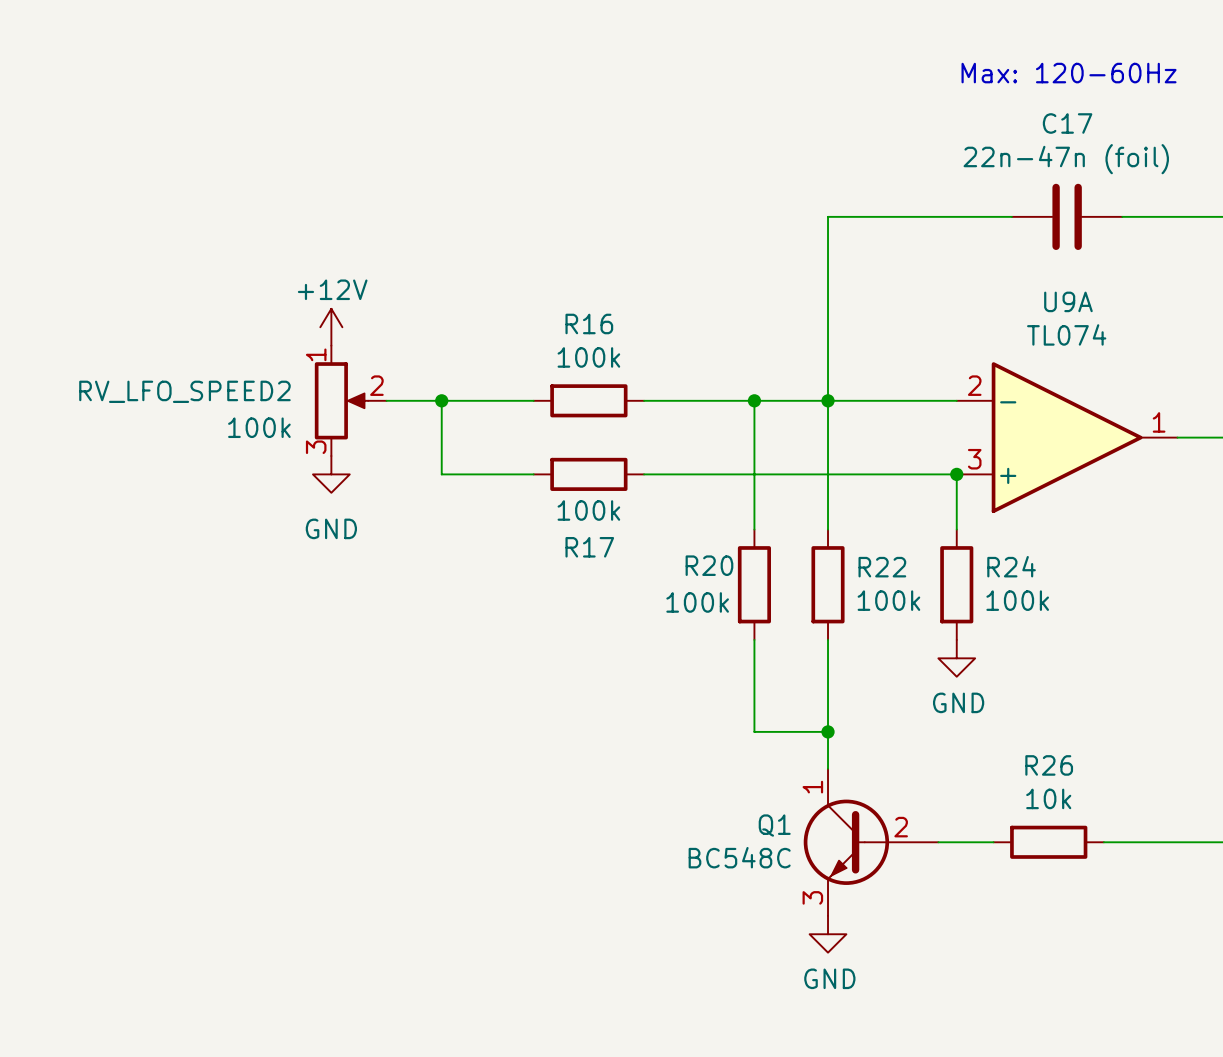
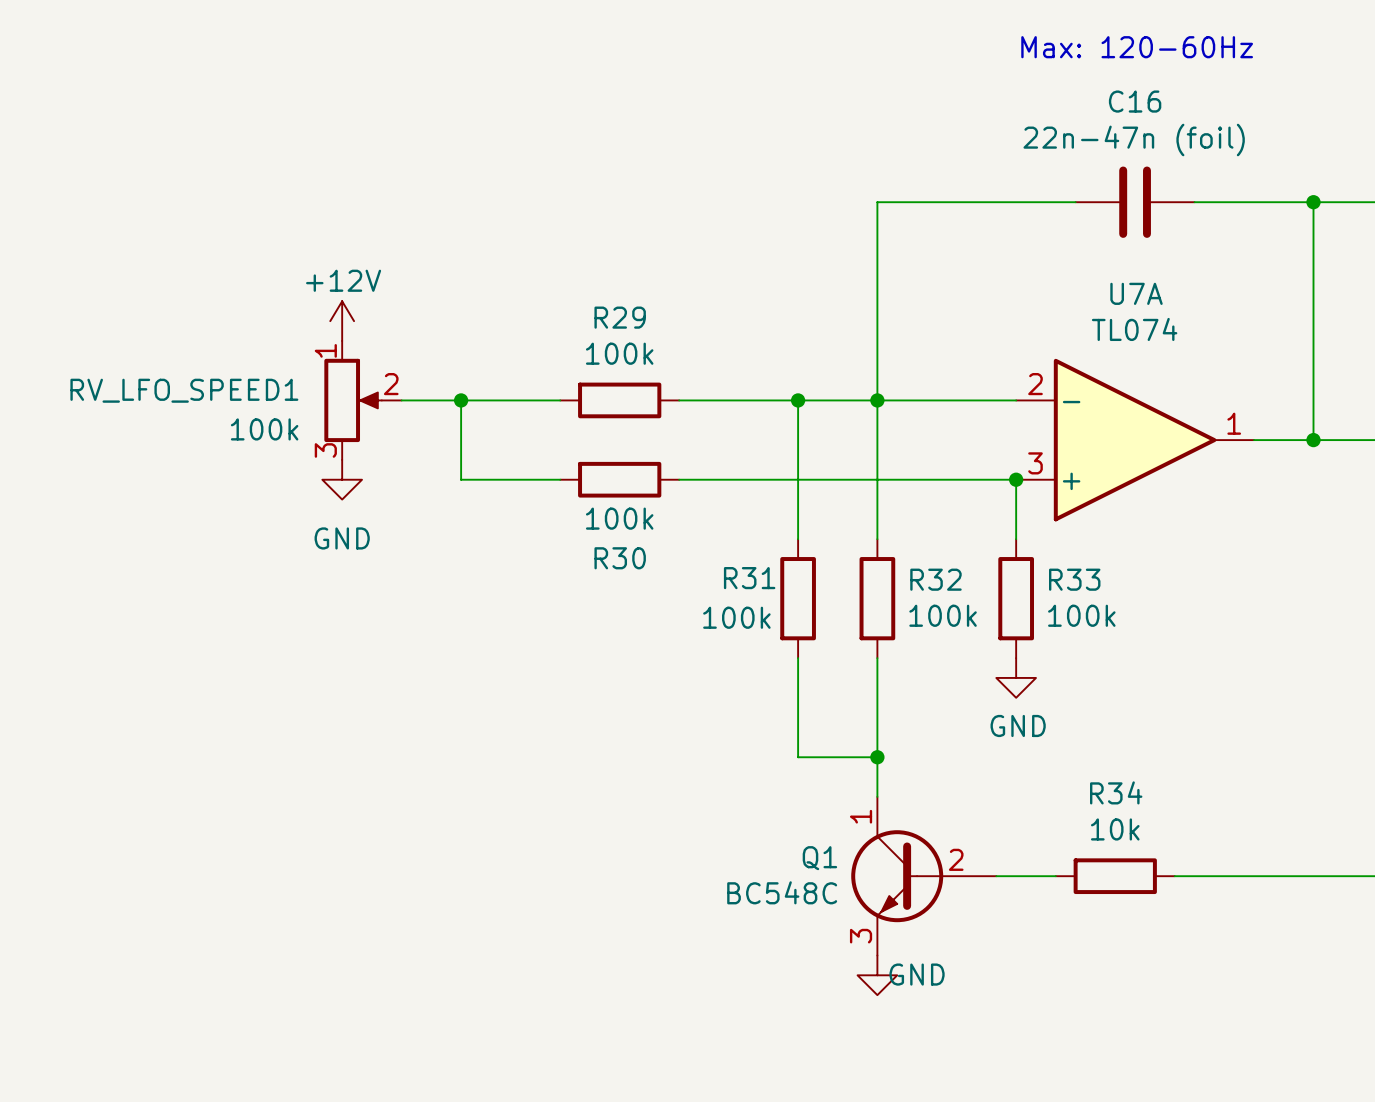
C17 name: C17 (1067, 123) -> C16 (1135, 101)
U9A name: U9A (1068, 301) -> U7A (1136, 293)
R16 name: R16 (589, 323) -> R29 (620, 317)
RV_LFO_SPEED2 name: RV_LFO_SPEED2 (184, 391) -> RV_LFO_SPEED1 (184, 390)
R17 name: R17 (589, 547) -> R30 (620, 558)
R20 name: R20 (709, 565) -> R31 (749, 578)
R24 name: R24 (1011, 566) -> R33 (1074, 579)
R22 name: R22 (882, 567) -> R32 (935, 579)
R26 name: R26 (1049, 765) -> R34 (1116, 792)
power symbol text position: GND (829, 978) -> GND (917, 974)

